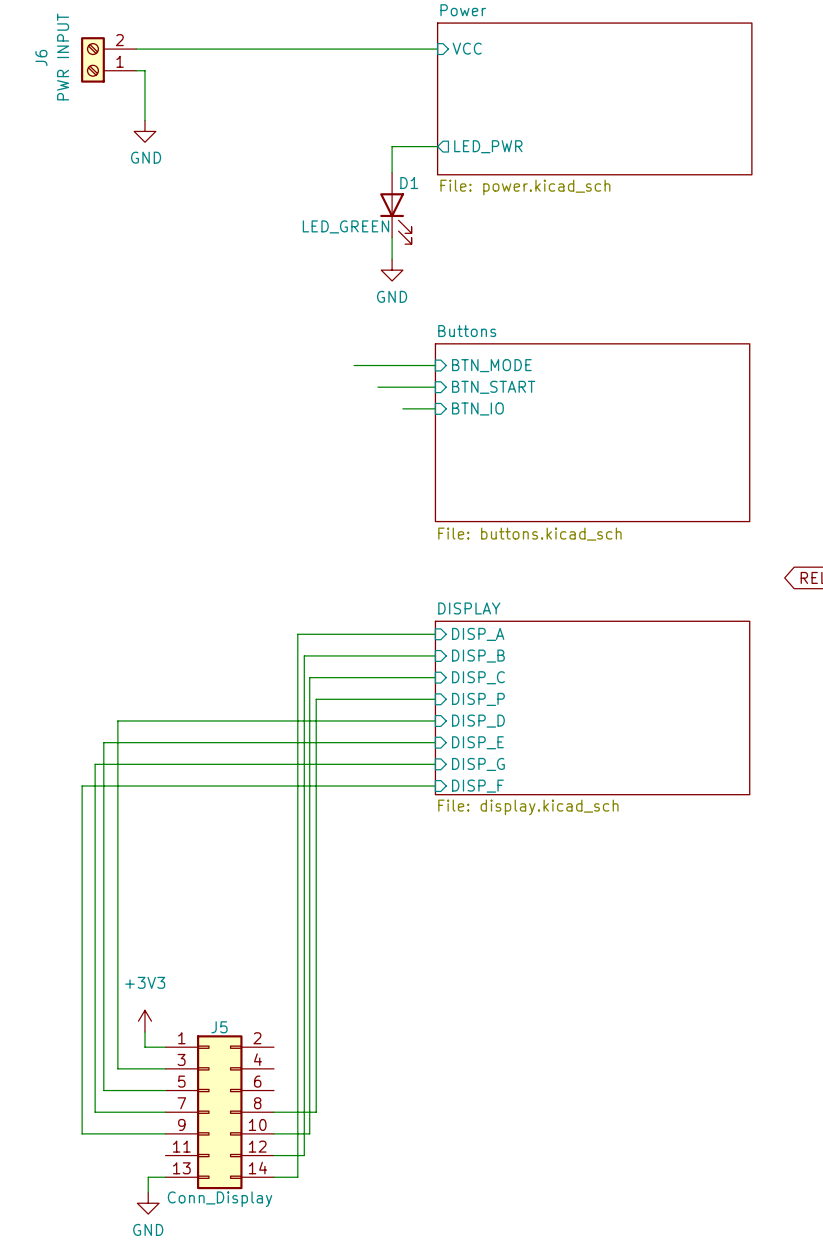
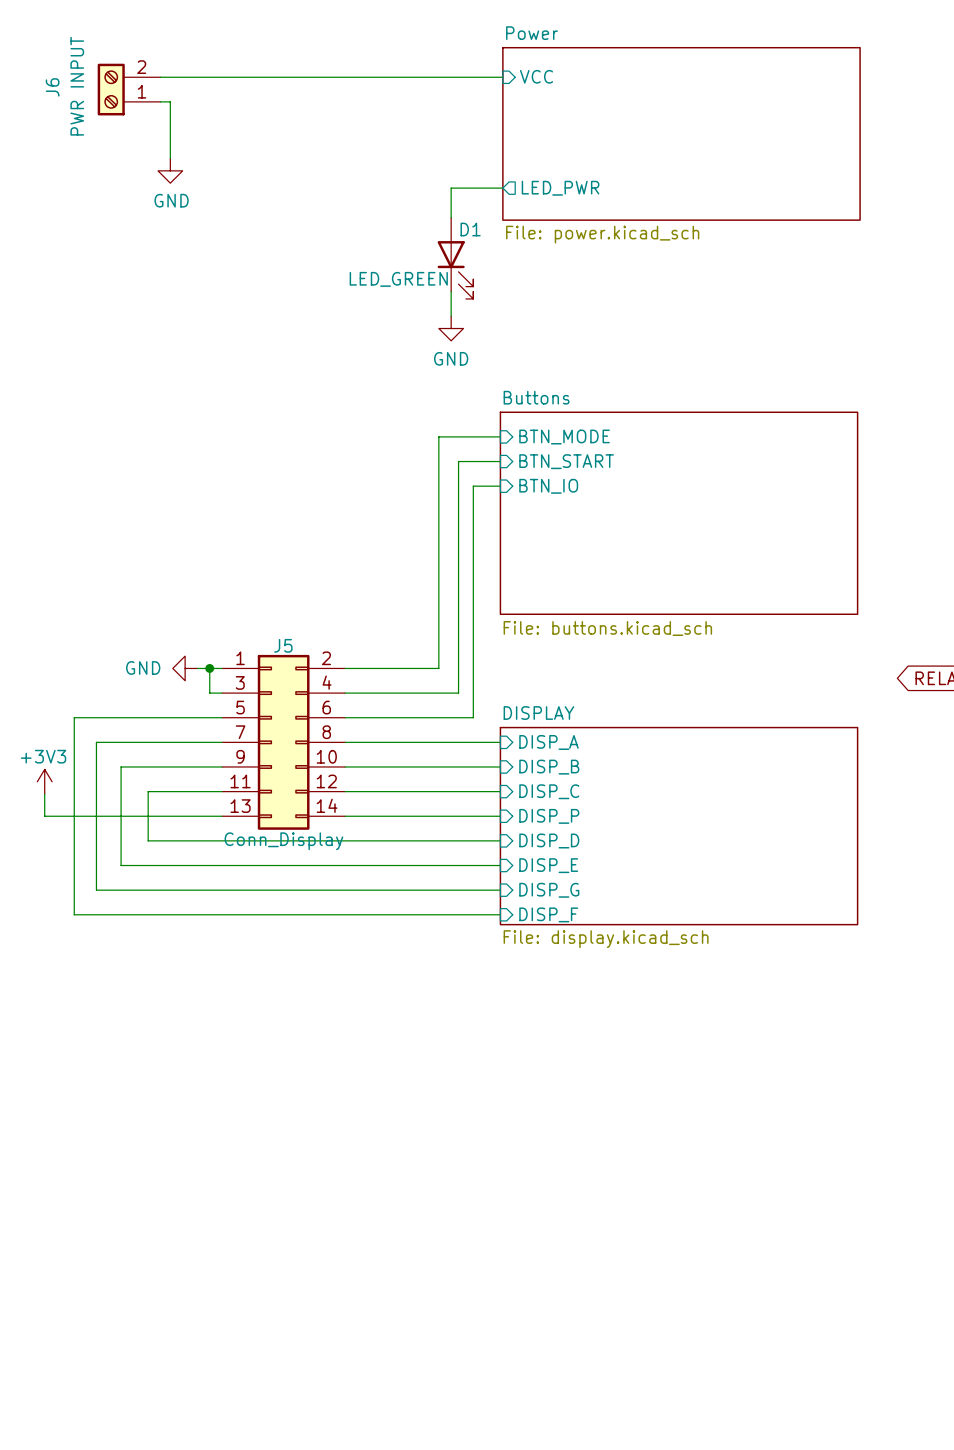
wire: (354, 365) (381, 365) -> (345, 668) (438, 668) (438, 436)
wire: (377, 387) (398, 387) -> (345, 693) (458, 693) (458, 461)
wire: (402, 408) (411, 408) -> (345, 717) (473, 717) (473, 486)
power symbol: none -> GND (185, 668)
wire: none -> (197, 668) (222, 668)
wire: none -> (209, 668) (209, 693) (222, 693)
junction: none -> (209, 668)
wire: (298, 634) (297, 1177) (273, 1177) -> none
wire: (304, 655) (304, 1155) (273, 1155) -> (351, 766) (345, 766)
power symbol: none -> +3V3 (44, 781)
wire: (309, 677) (309, 1133) (273, 1133) -> (357, 791) (345, 791)
wire: none -> (44, 794) (44, 816) (222, 816)
wire: (316, 699) (316, 1112) (273, 1112) -> (364, 816) (345, 816)
wire: (125, 720) (117, 720) (117, 1068) (165, 1068) -> (148, 840) (148, 791) (222, 791)
wire: (103, 742) (103, 1090) (165, 1090) -> (123, 865) (121, 865) (121, 766) (222, 766)
wire: (95, 764) (95, 1112) (165, 1112) -> (113, 890) (96, 890) (96, 742) (222, 742)
wire: (82, 786) (82, 1133) (165, 1133) -> (98, 914) (74, 914) (74, 717) (222, 717)
power symbol: +3V3 (144, 1021) -> none
wire: (144, 1032) (144, 1047) (165, 1047) -> none
J5 position: (219, 1112) -> (283, 742)
wire: (165, 1177) (148, 1177) (148, 1192) -> none
power symbol: GND (148, 1203) -> none

